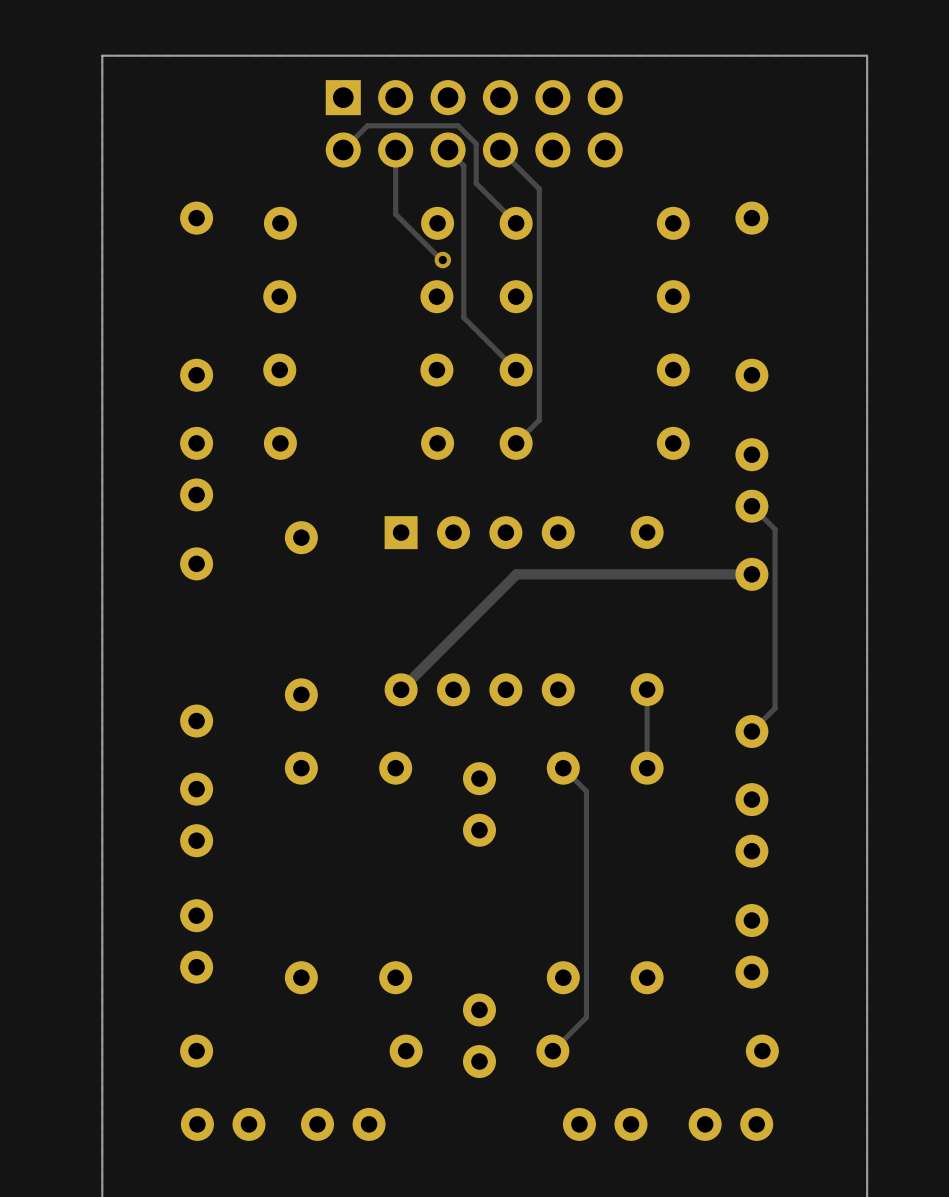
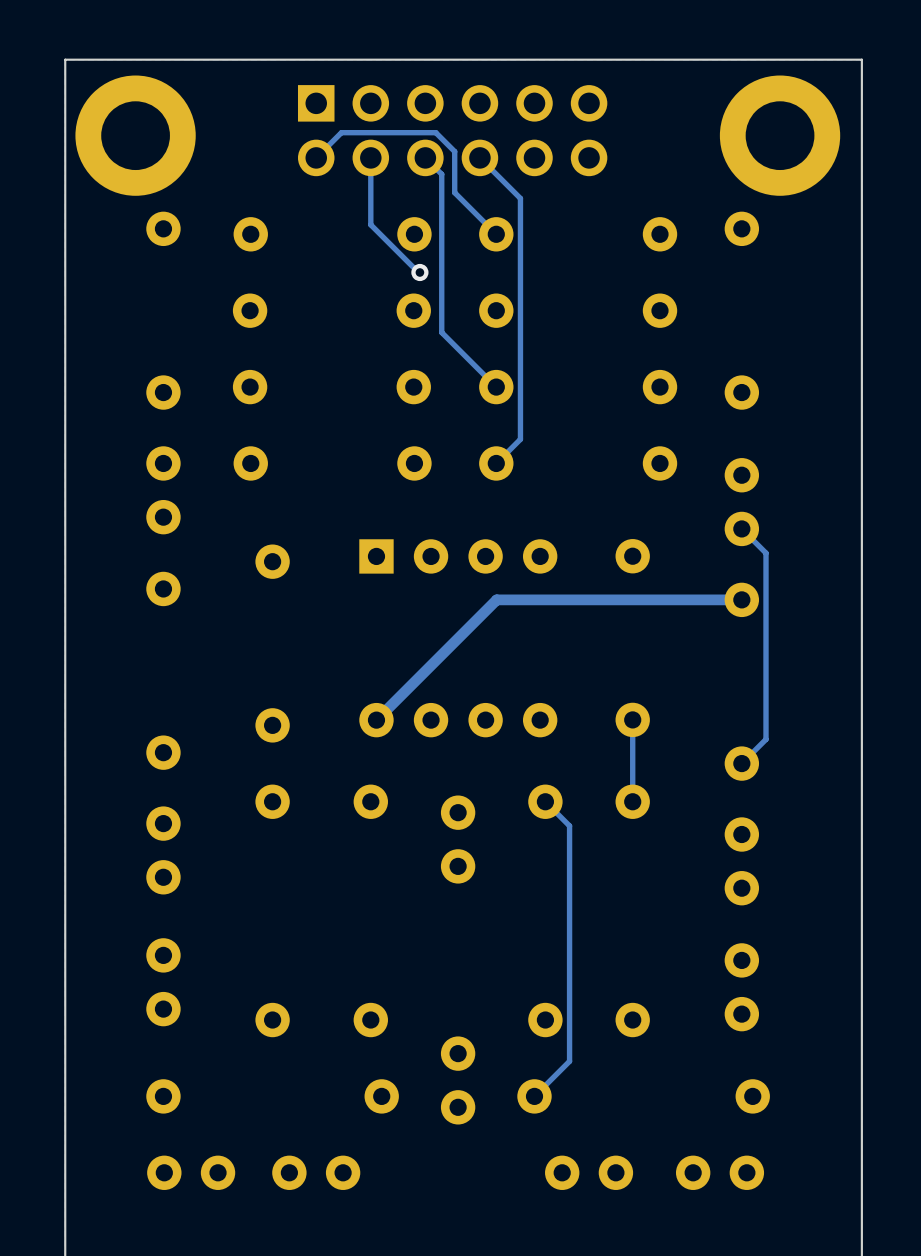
part: none -> (135, 135)
part: none -> (780, 135)

